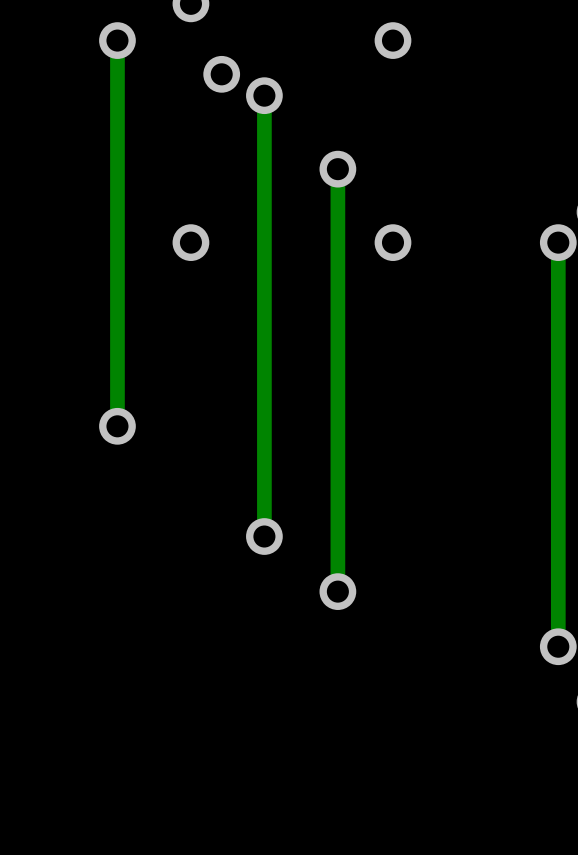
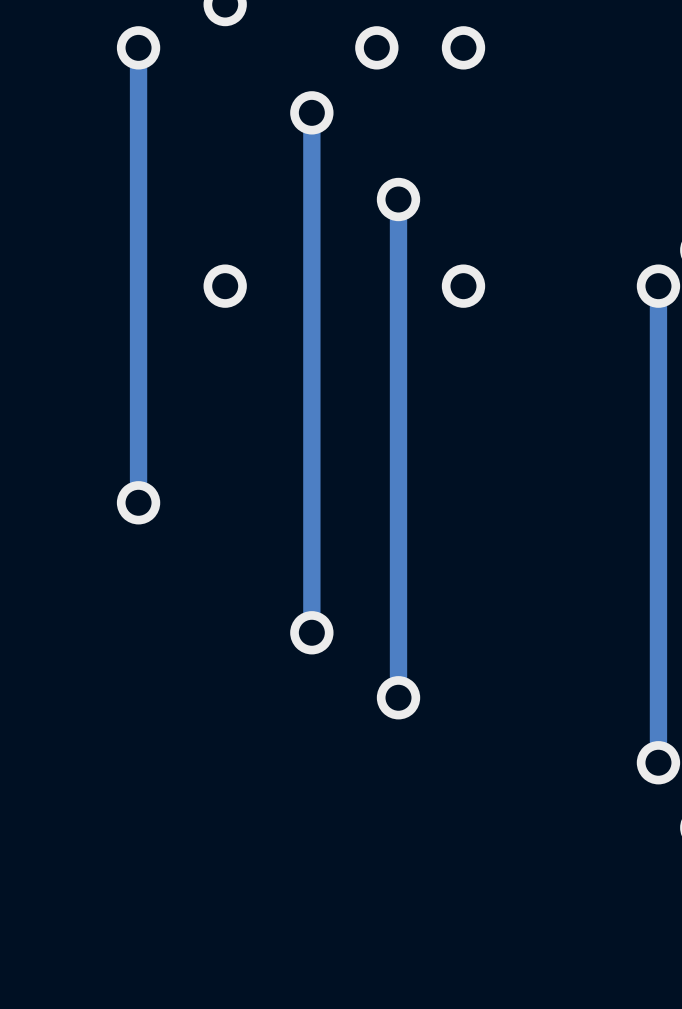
via: none -> (376, 47)
via: (221, 74) -> none

